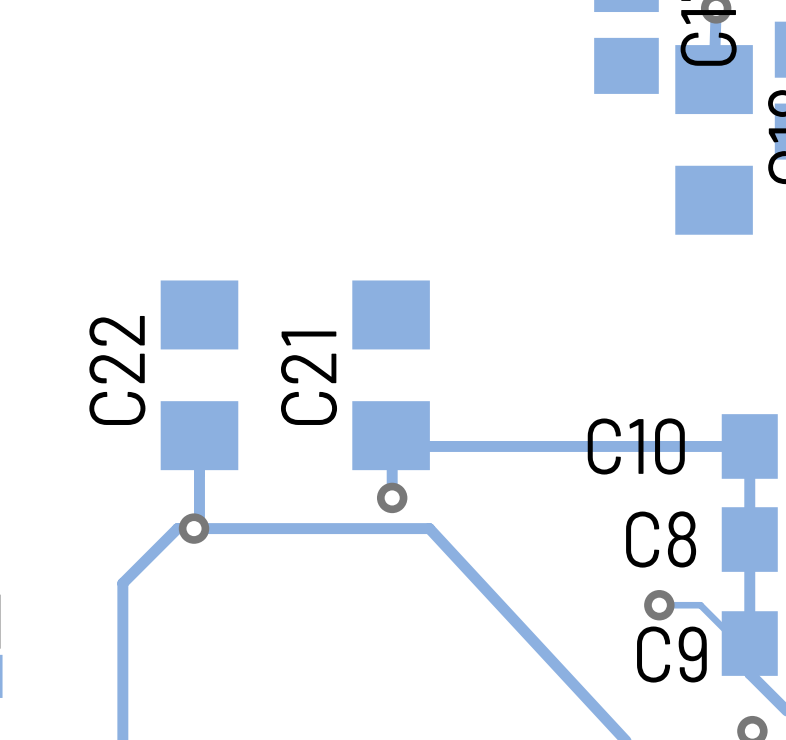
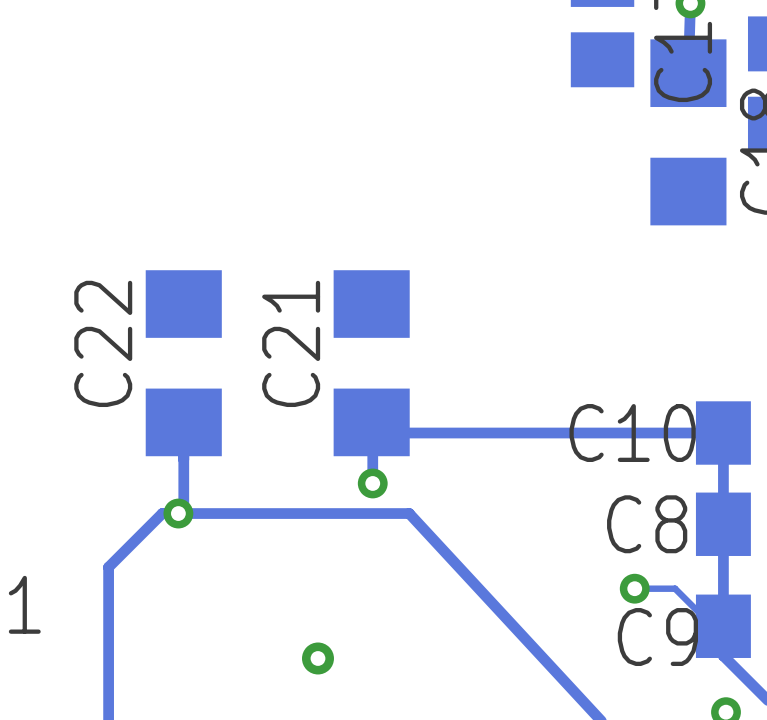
via: none -> (317, 658)

